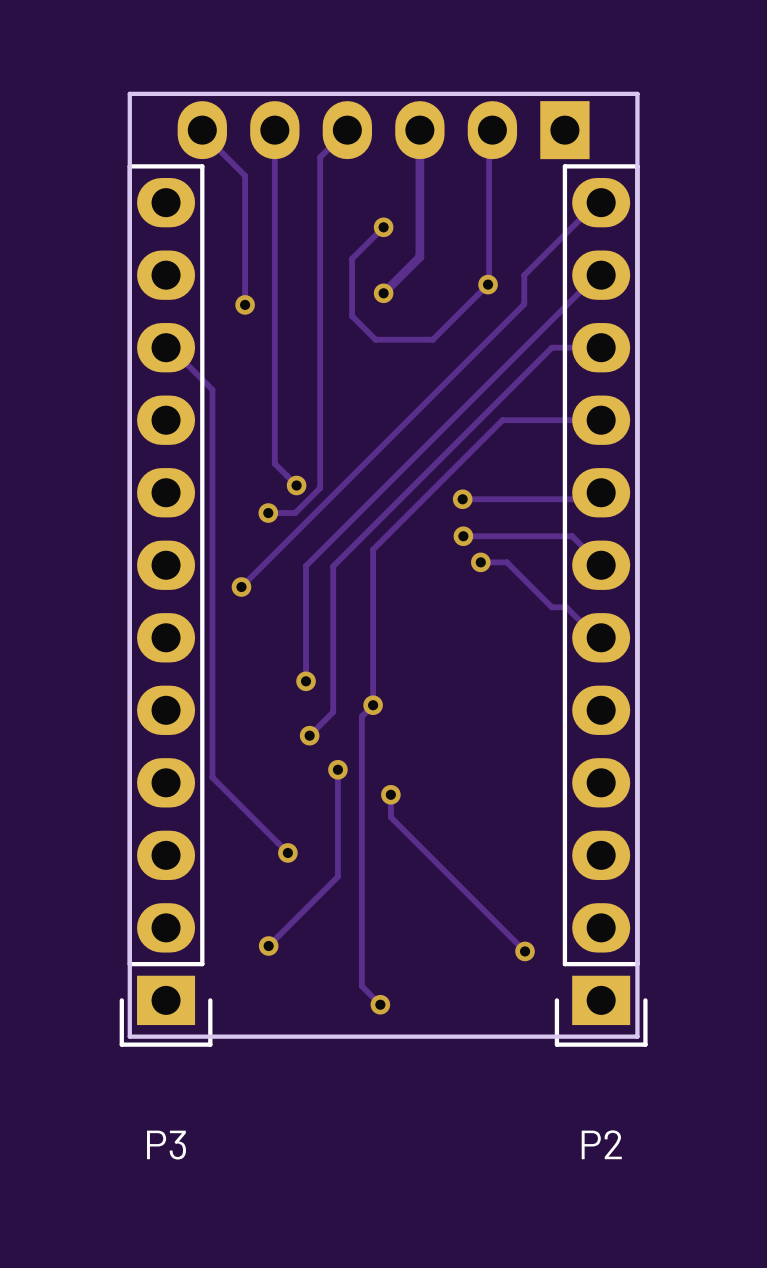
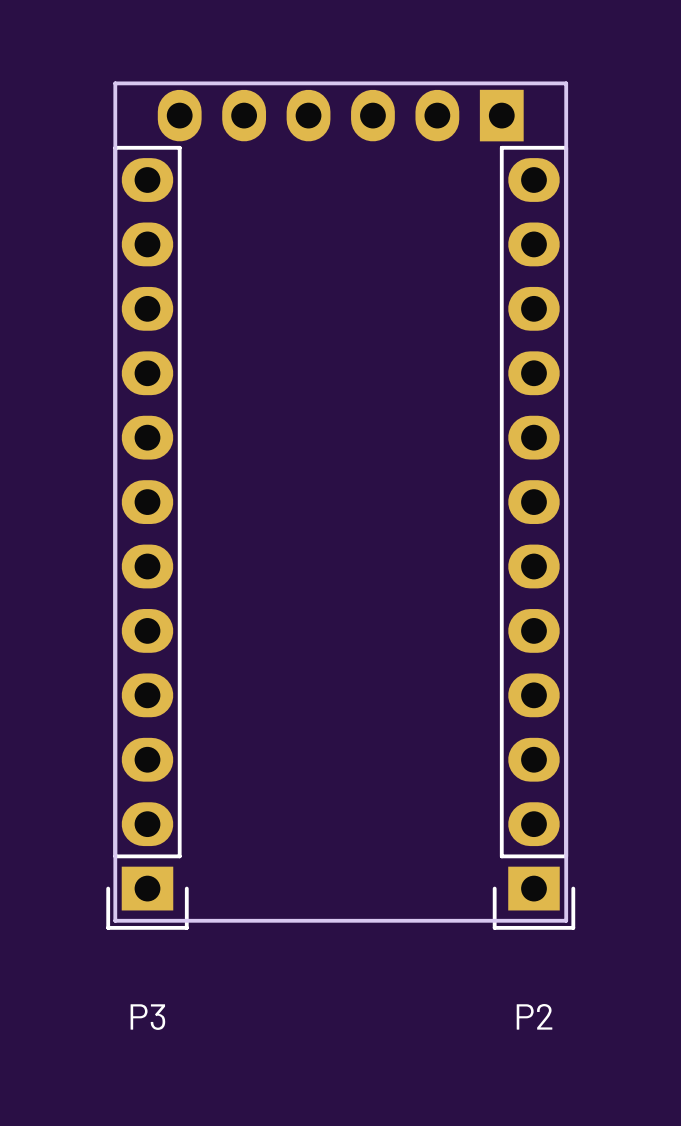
track: (202, 130) (200, 130) (245, 175) (245, 304) -> none
track: (274, 130) (274, 463) (296, 485) -> none
track: (347, 130) (320, 157) (320, 488) (295, 513) (268, 513) -> none
track: (419, 130) (419, 257) (383, 293) -> none
track: (492, 130) (489, 133) (489, 283) (432, 339) (375, 339) (352, 316) (352, 258) (383, 227) -> none
track: (601, 202) (596, 202) (524, 275) (524, 304) (241, 587) -> none
via: (383, 227) -> none
track: (601, 275) (596, 275) (306, 565) (306, 681) -> none
via: (488, 284) -> none
via: (383, 293) -> none
via: (245, 304) -> none
track: (166, 347) (170, 347) (212, 389) (212, 777) (287, 852) -> none
track: (601, 347) (551, 347) (333, 566) (333, 712) (309, 735) -> none
track: (601, 420) (502, 420) (373, 549) (373, 705) (361, 716) (361, 986) (380, 1004) -> none
via: (296, 485) -> none
track: (601, 492) (594, 499) (462, 499) -> none
via: (462, 499) -> none
via: (268, 513) -> none
track: (463, 536) (572, 536) (601, 565) -> none
via: (463, 536) -> none
track: (480, 562) (506, 562) (551, 607) (566, 607) (596, 637) (601, 637) -> none
via: (480, 562) -> none
via: (241, 587) -> none
via: (306, 681) -> none
via: (373, 705) -> none
via: (309, 735) -> none
track: (337, 769) (337, 876) (268, 945) -> none
via: (337, 769) -> none
track: (390, 794) (390, 817) (525, 951) -> none
via: (390, 794) -> none
via: (287, 852) -> none
via: (268, 945) -> none
via: (525, 951) -> none
via: (380, 1004) -> none

